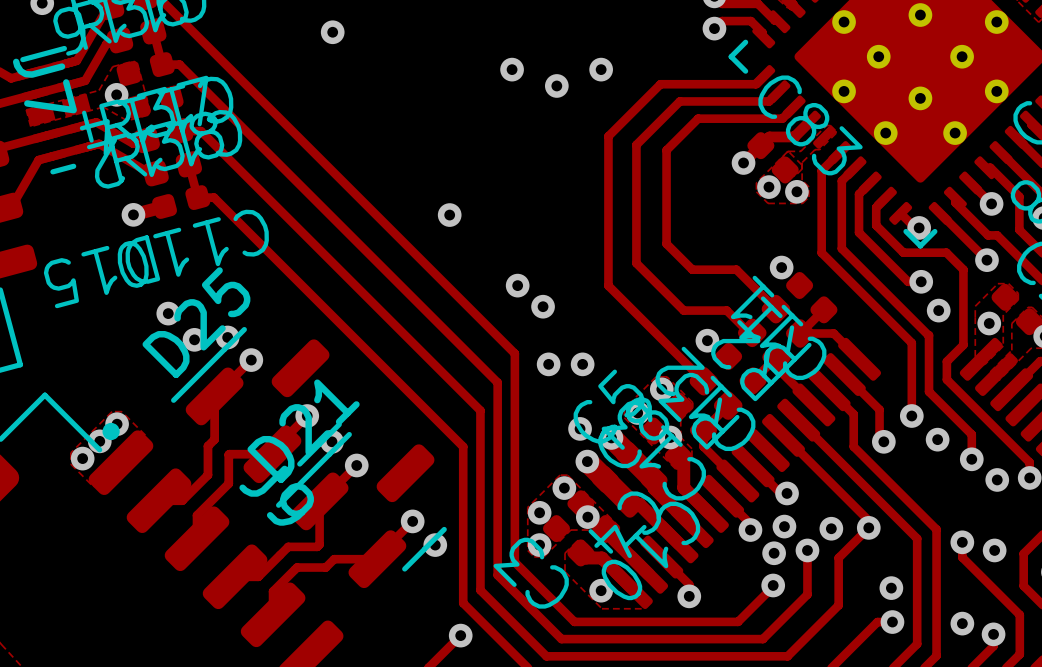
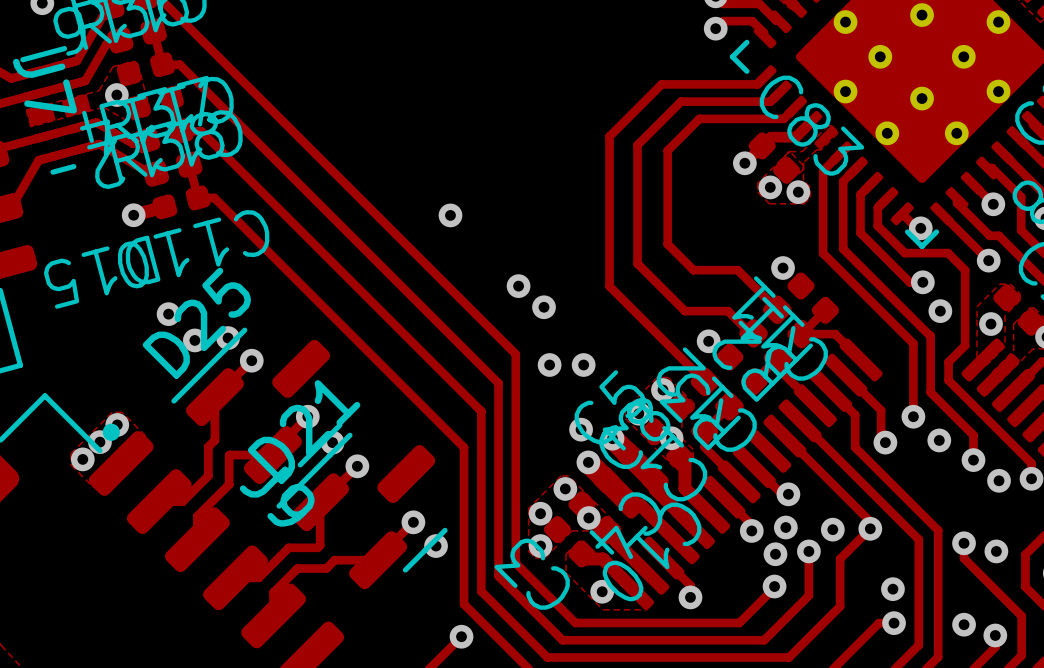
via: (332, 32) -> none
via: (512, 69) -> none
via: (601, 69) -> none
via: (556, 85) -> none

